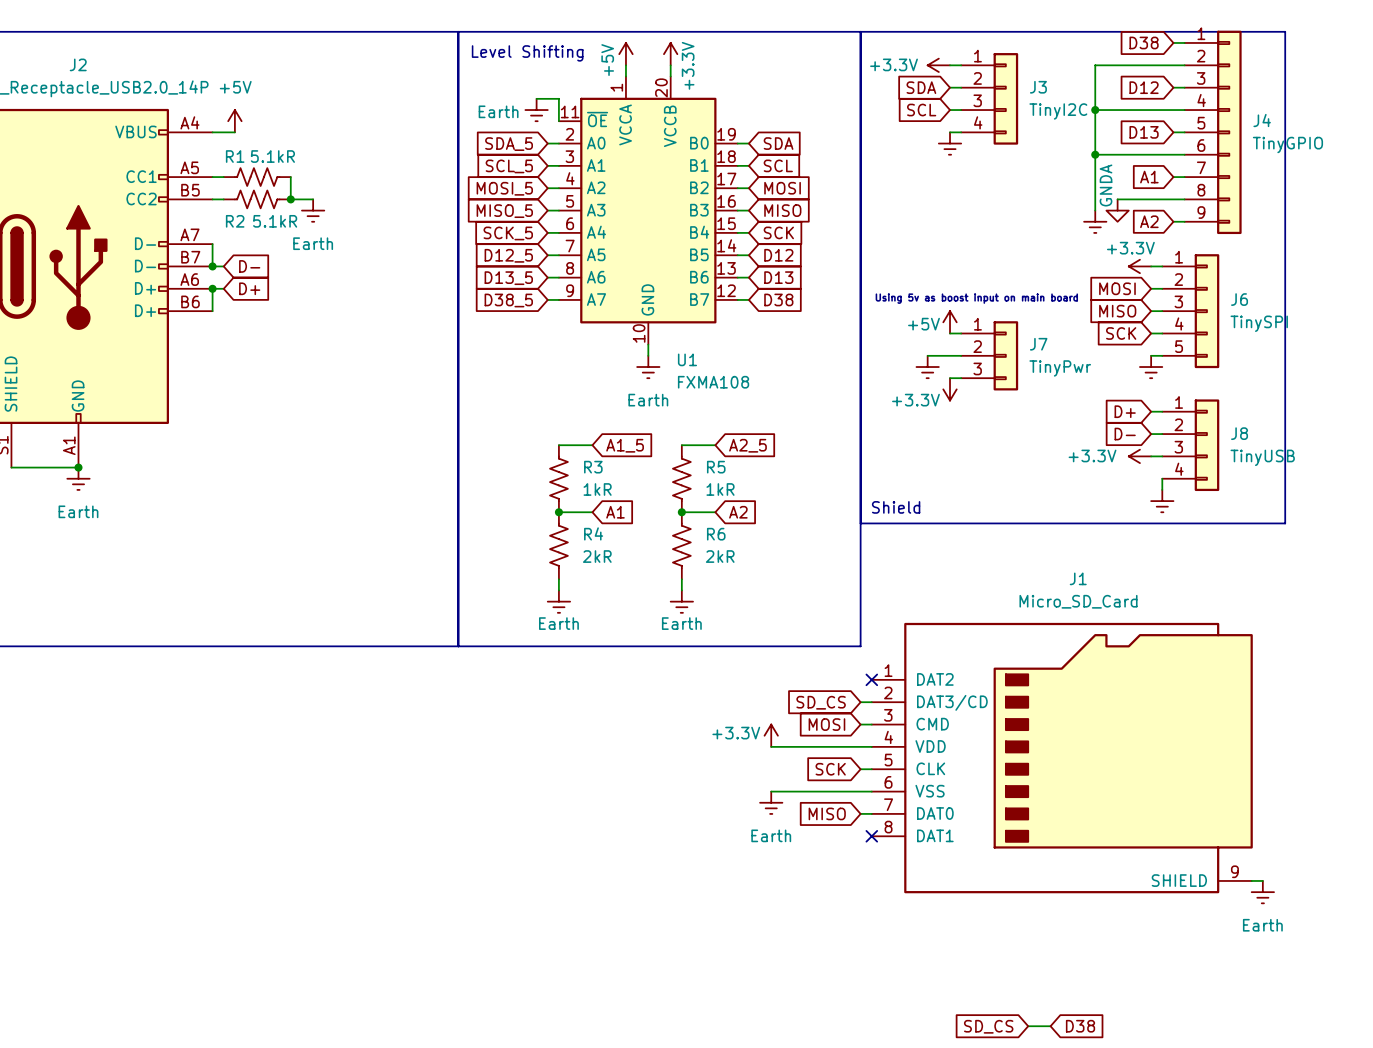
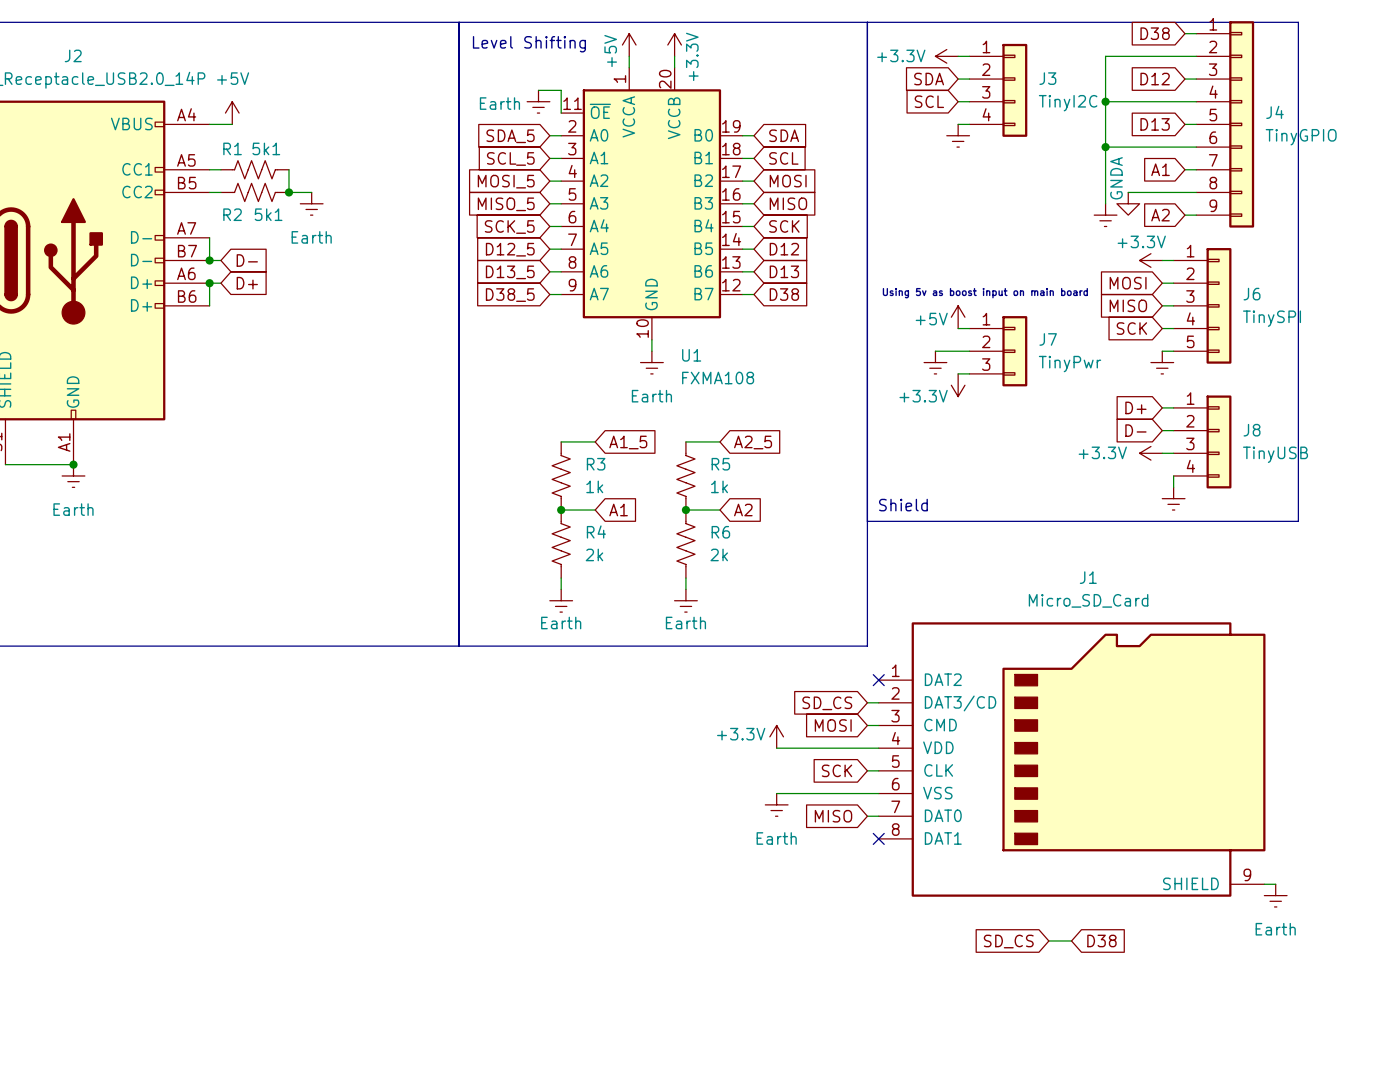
R1 value: 5.1kR (272, 156) -> 5k1 (266, 148)
R2 value: 5.1kR (275, 221) -> 5k1 (268, 214)
R3 value: 1kR (597, 489) -> 1k (594, 486)
R5 value: 1kR (720, 489) -> 1k (719, 486)
R4 value: 2kR (597, 556) -> 2k (594, 554)
R6 value: 2kR (720, 556) -> 2k (719, 554)
global label position: SD_CS (988, 1026) -> SD_CS (1008, 941)
wire: (1028, 1026) (1050, 1026) -> (1048, 940) (1071, 940)
global label position: D38 (1080, 1026) -> D38 (1101, 940)

